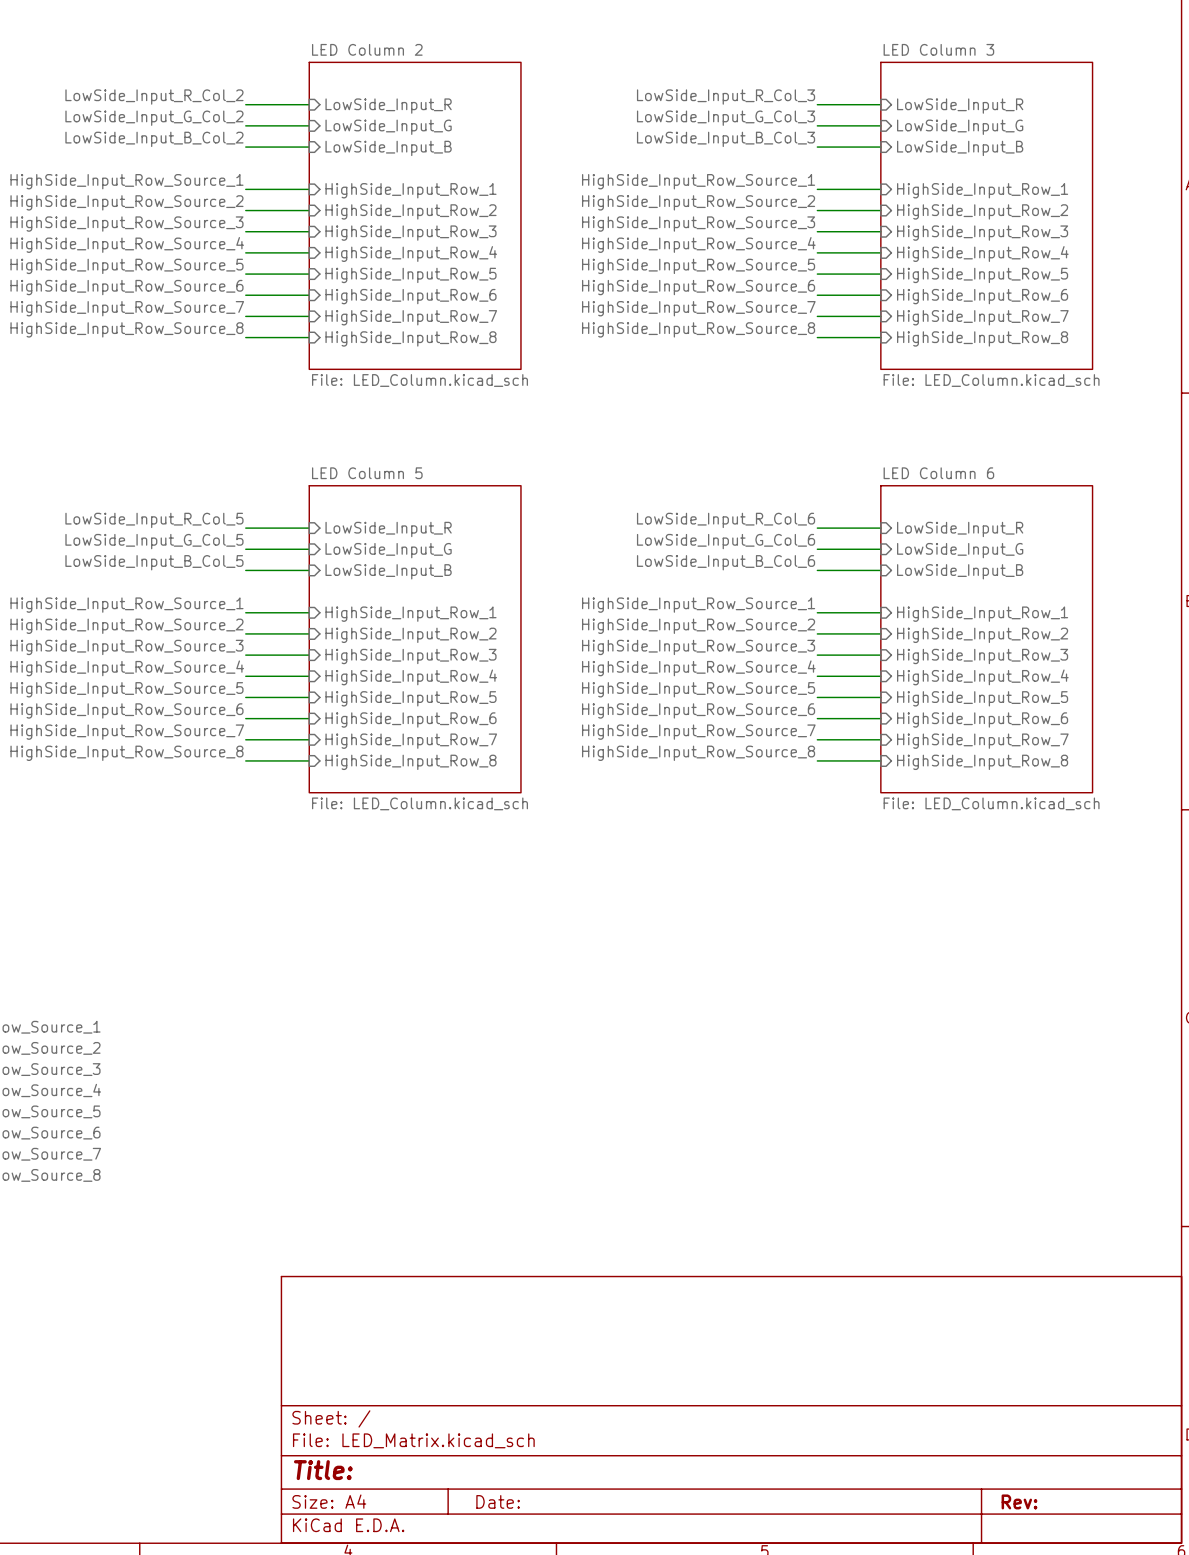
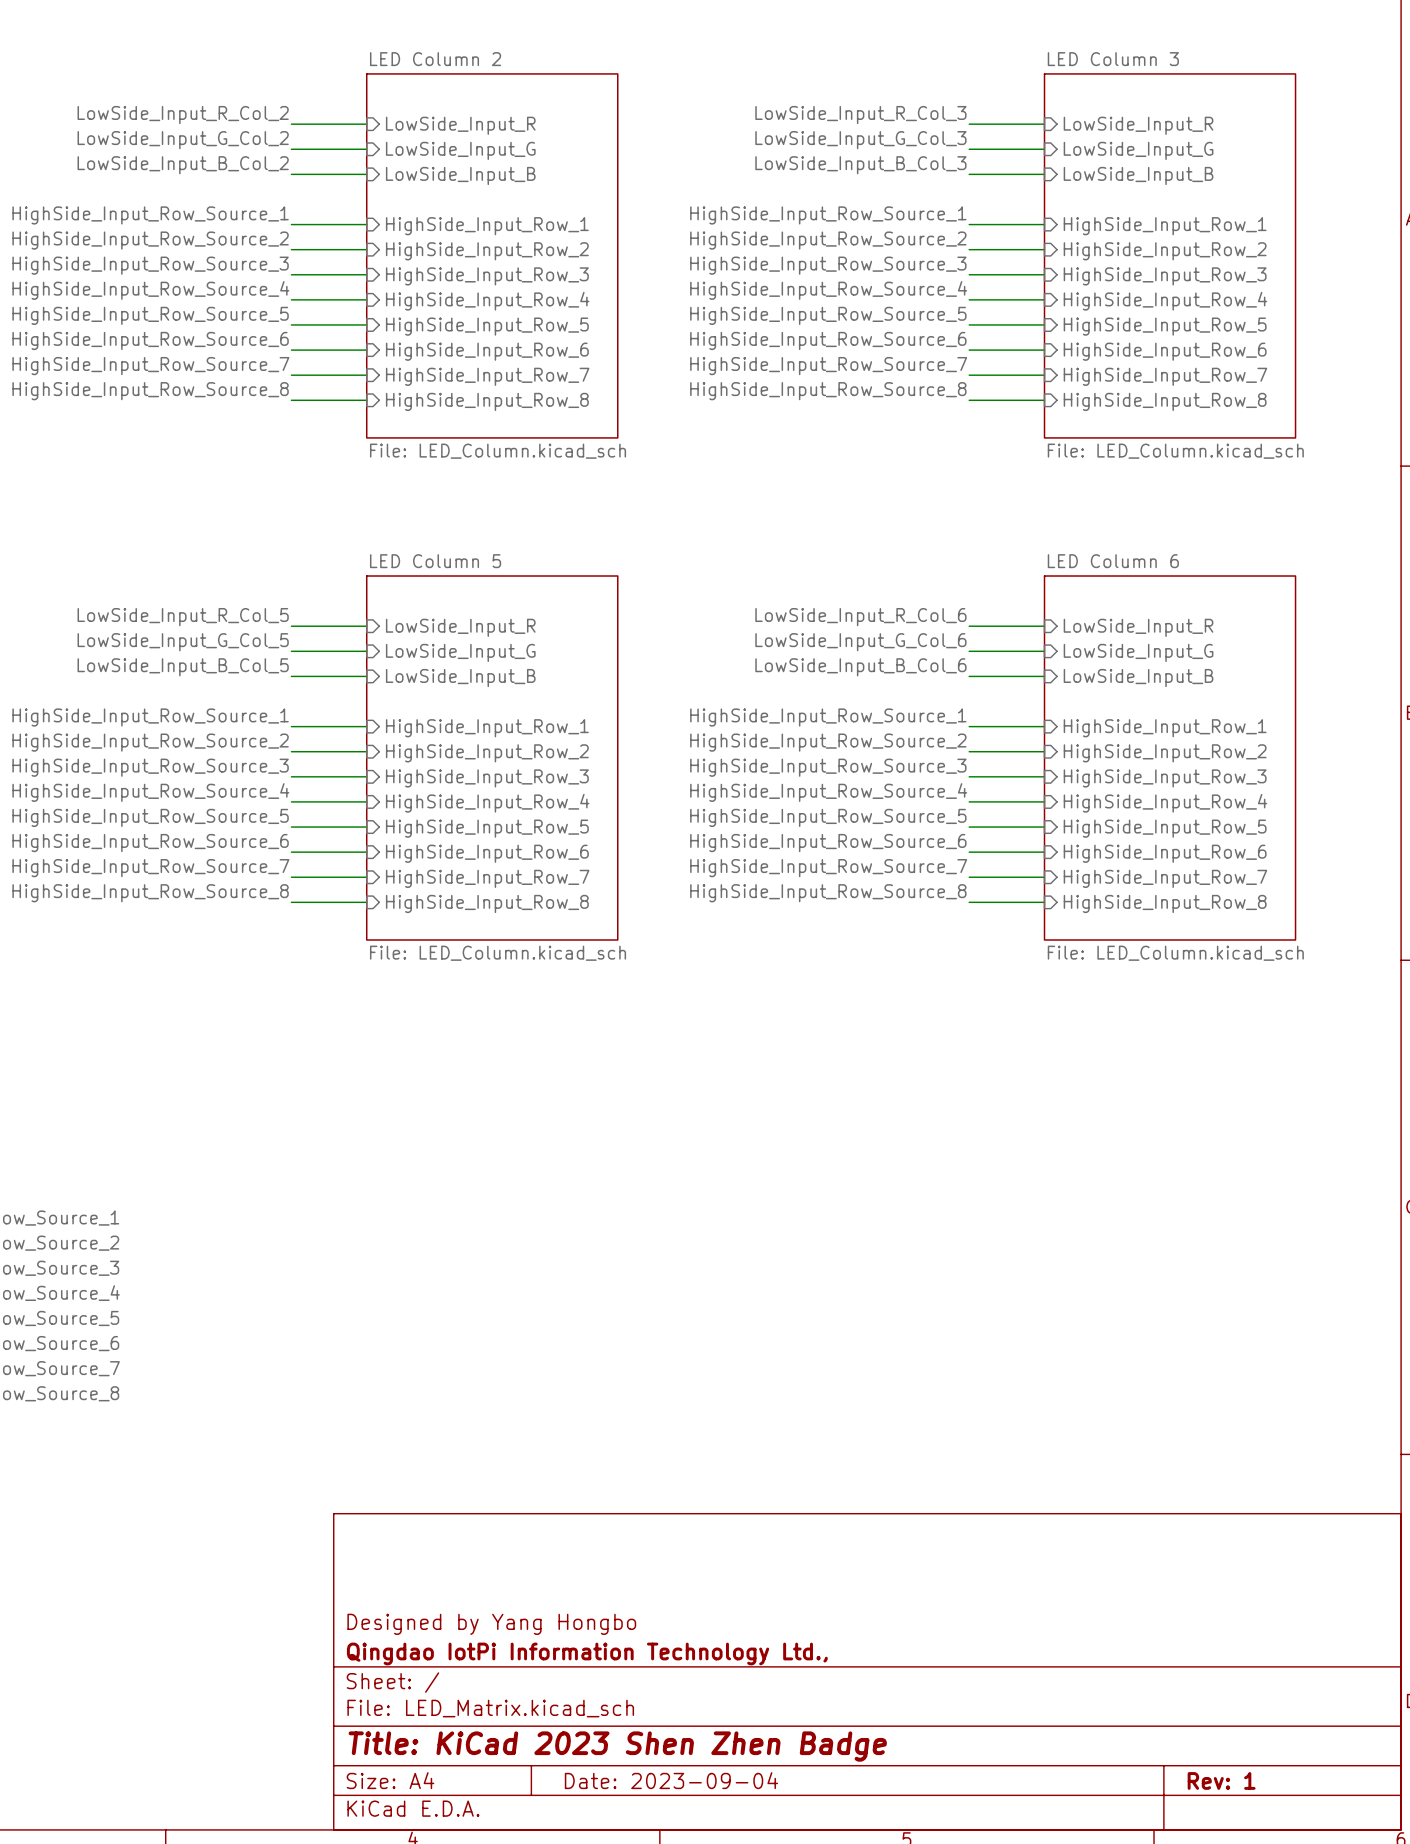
title block: none -> Designed by Yang Hongbo (491, 1624)
title block: none -> Qingdao IotPi Information Technology Ltd., (587, 1653)
title block: Title: (323, 1470) -> Title: KiCad 2023 Shen Zhen Badge (617, 1746)
title block: Date: (498, 1501) -> Date: 2023-09-04 (671, 1780)
title block: Rev: (1019, 1501) -> Rev: 1 (1221, 1780)

